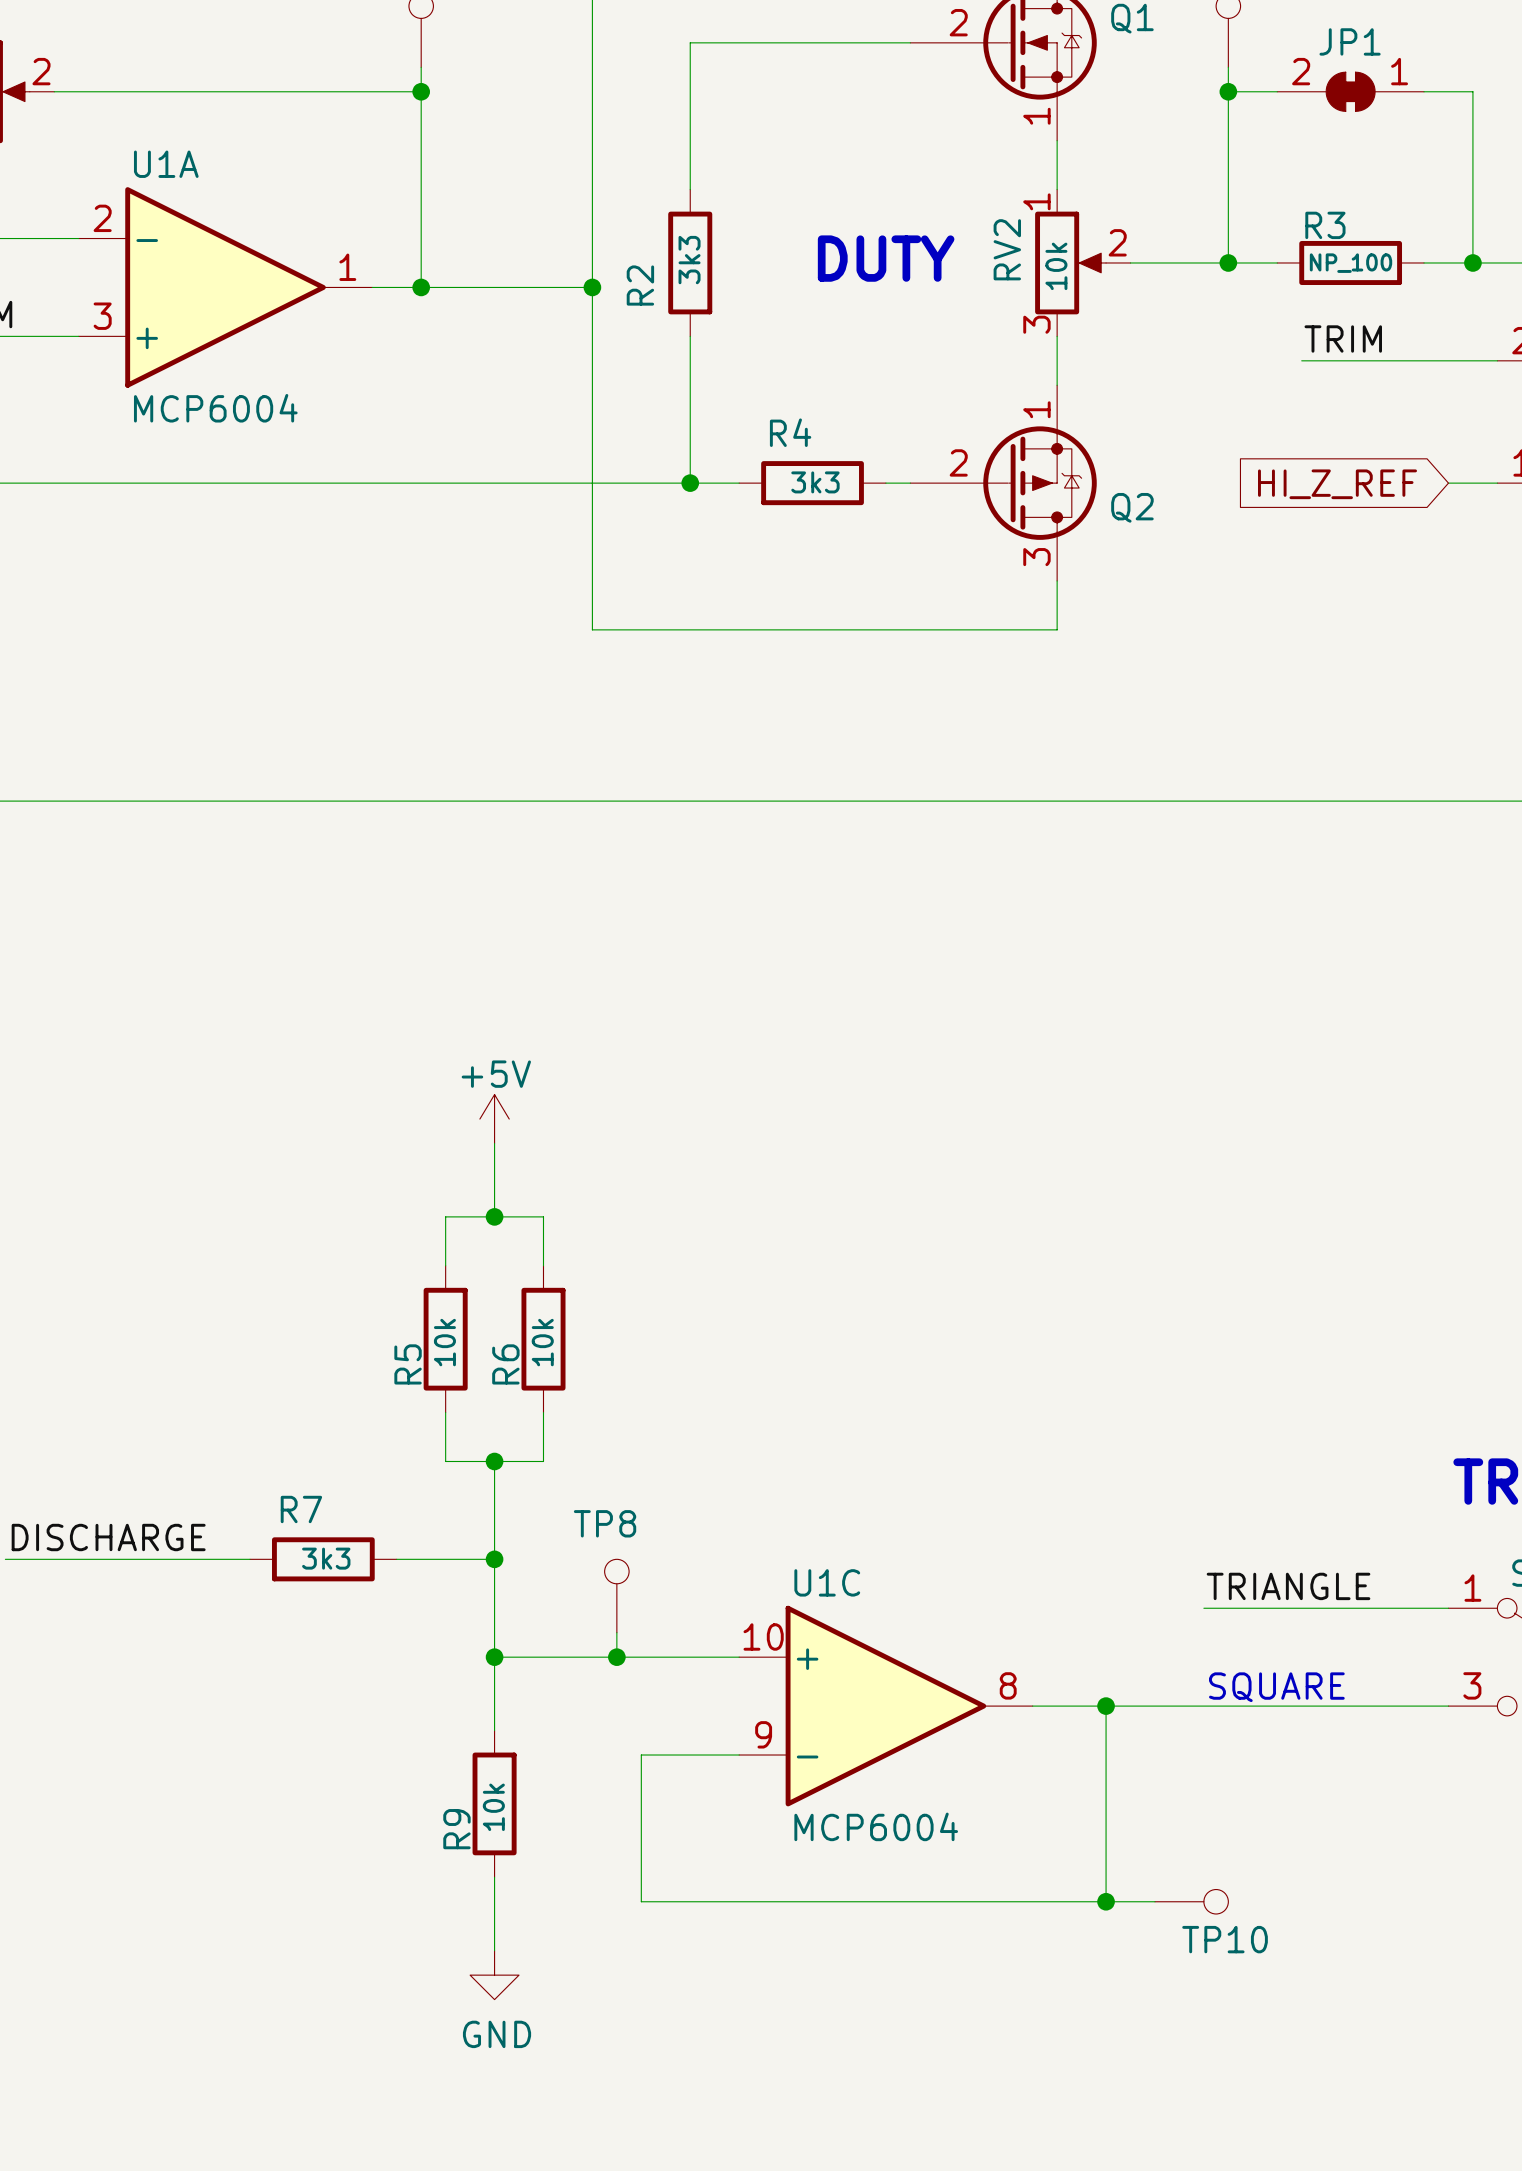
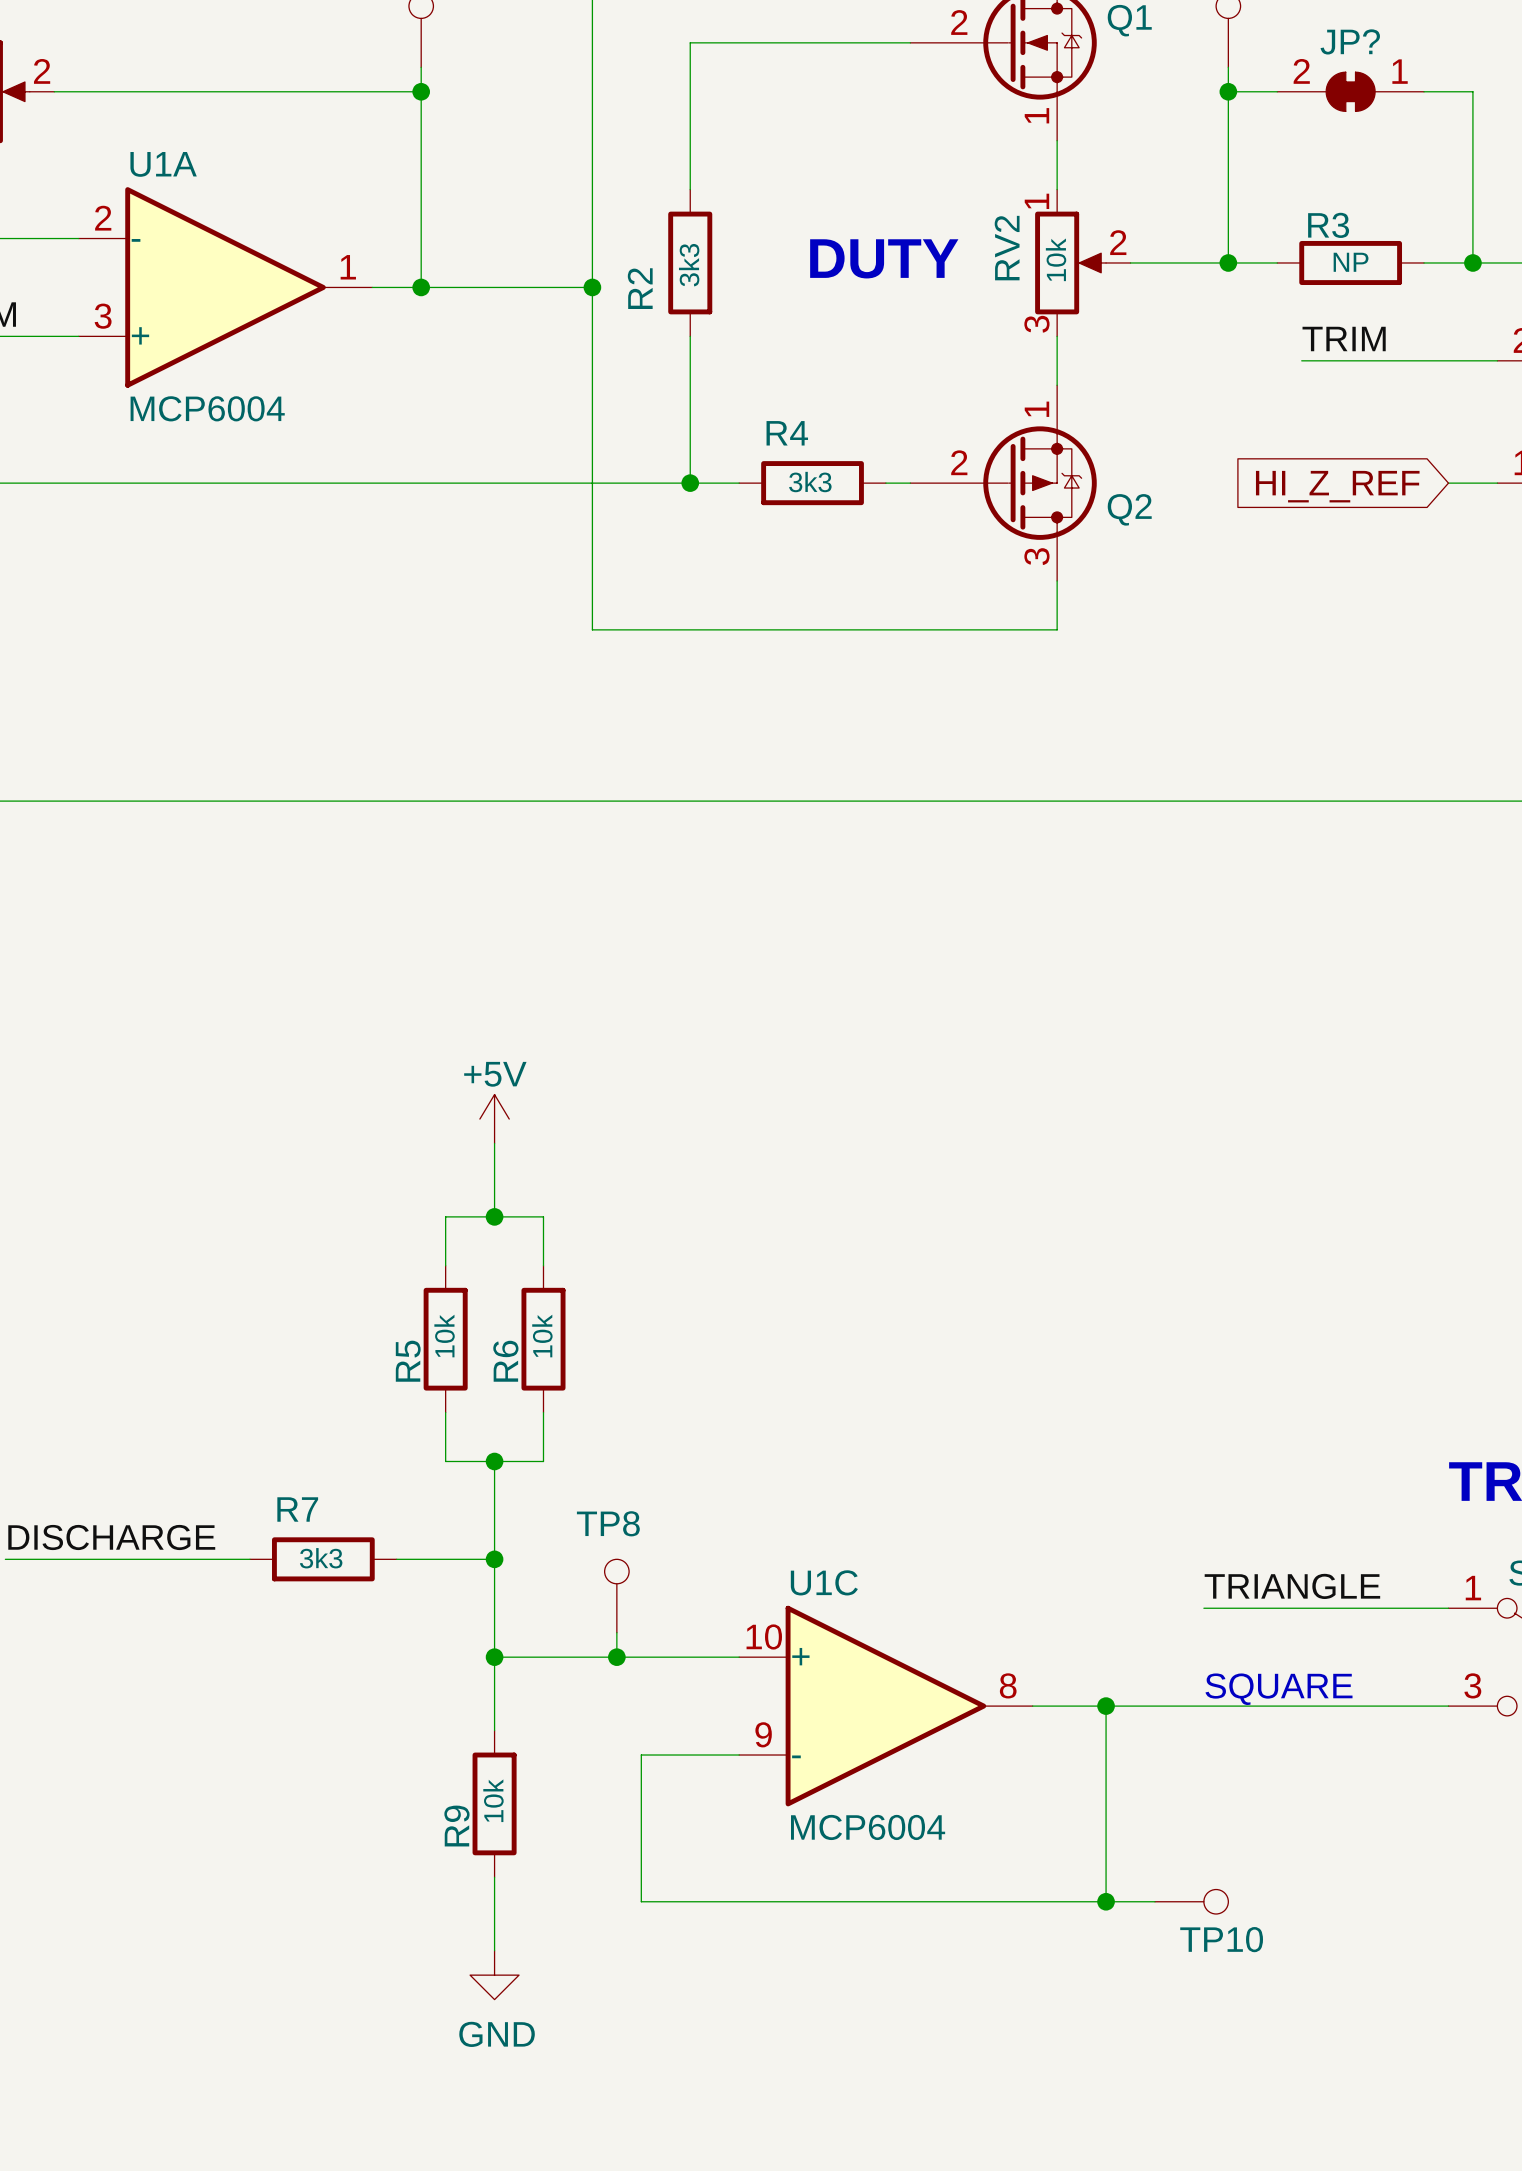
JP1 name: JP1 (1350, 41) -> JP? (1350, 41)
R3 value: NP_100 (1351, 263) -> NP (1351, 262)

